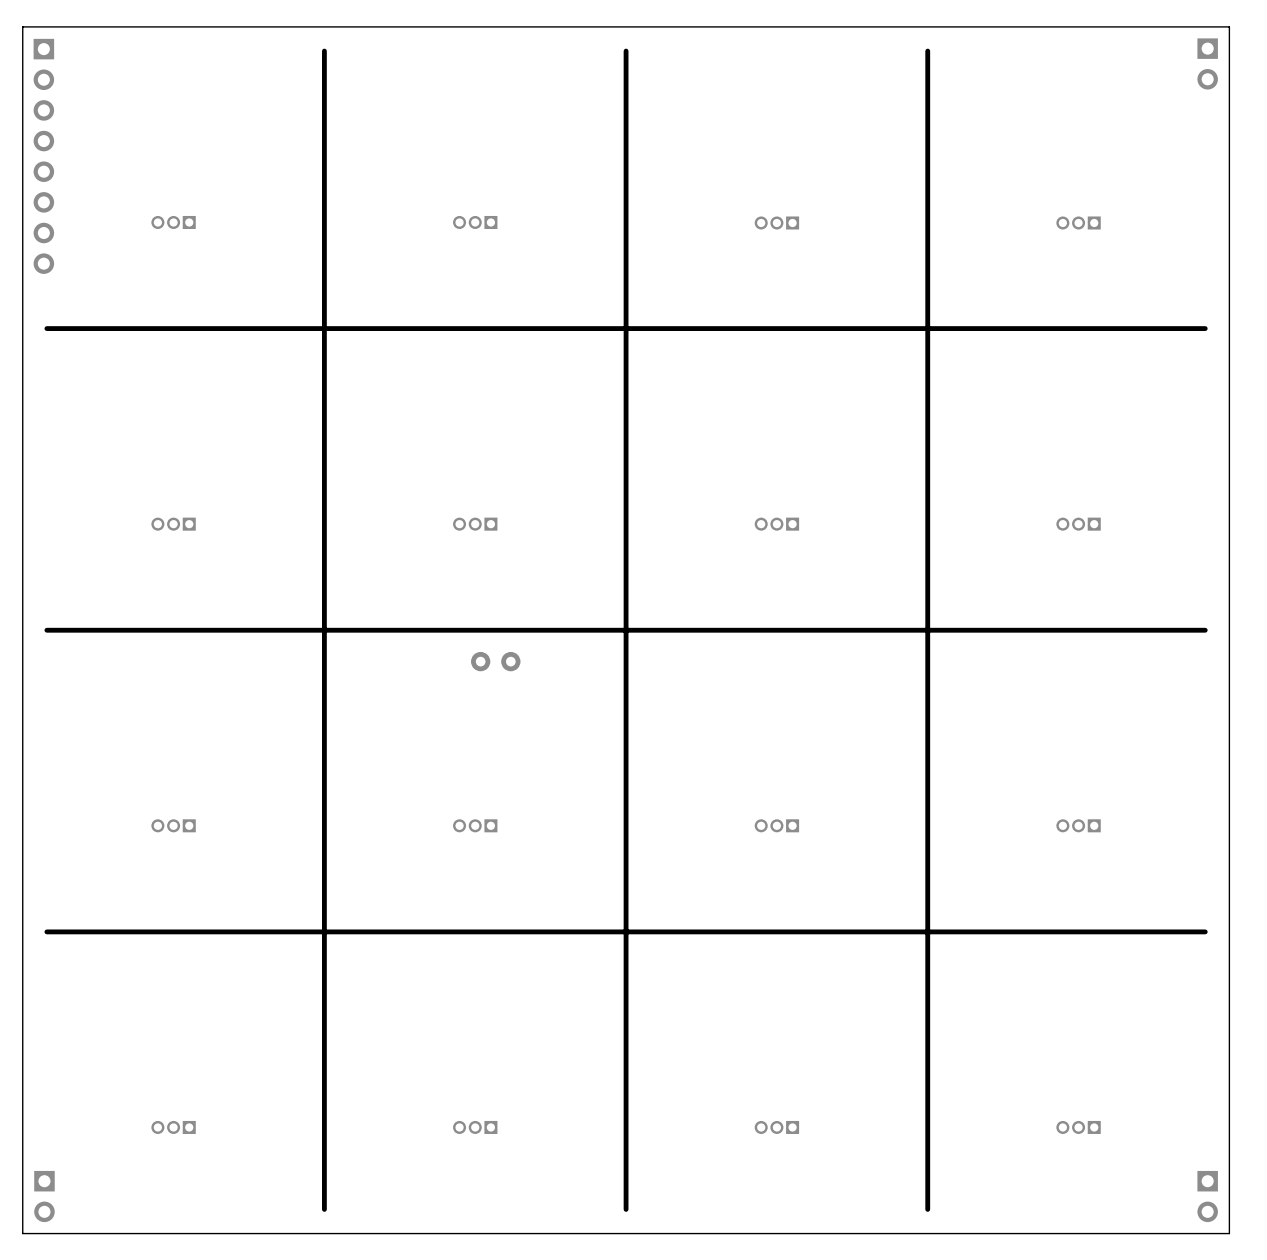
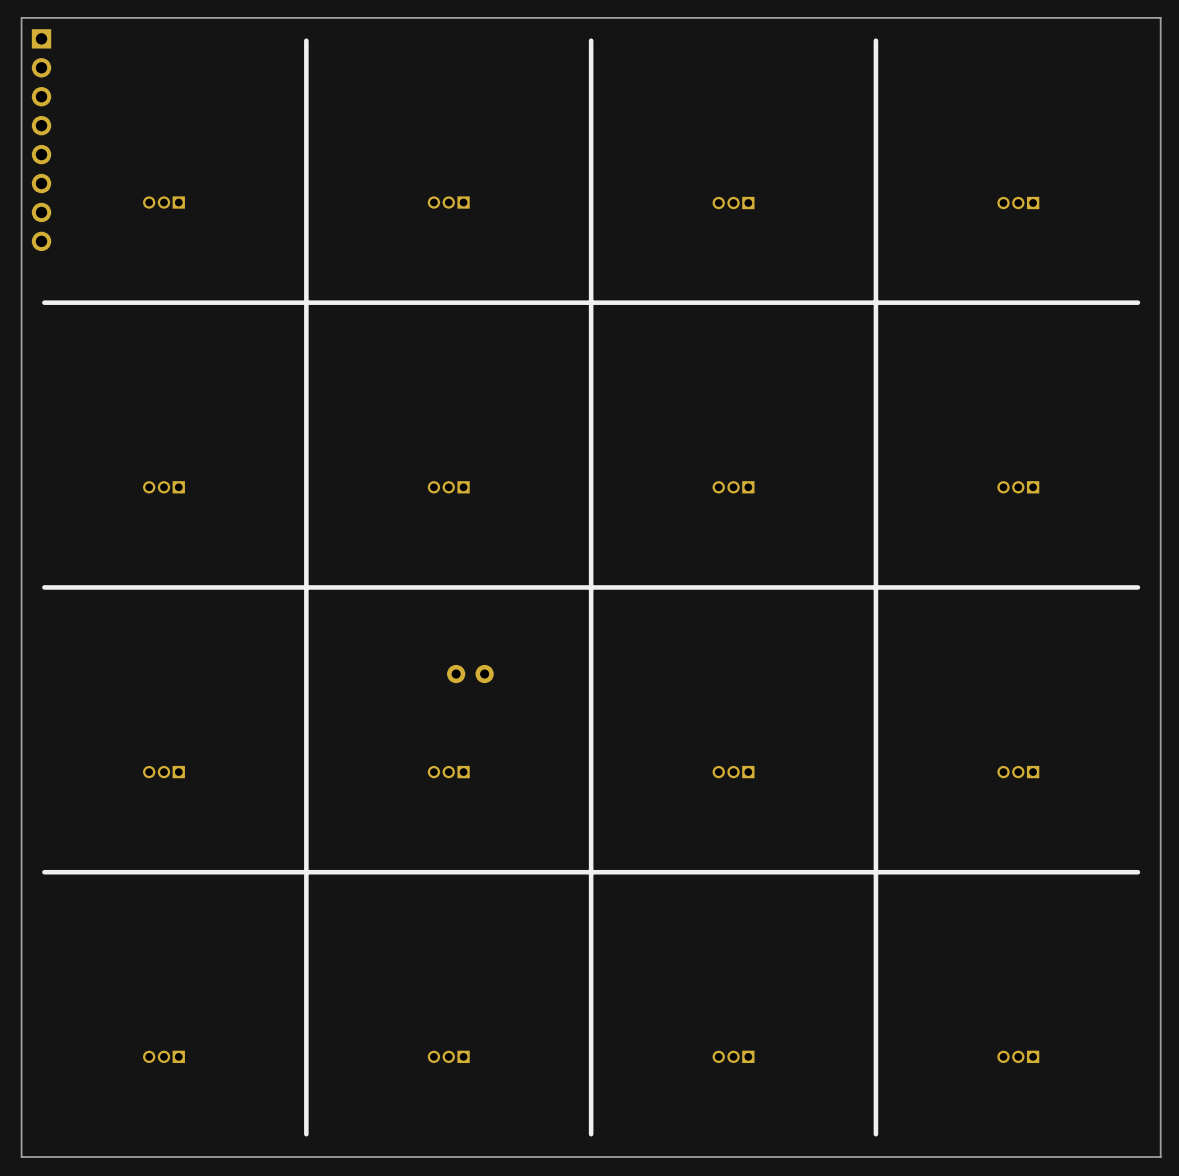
part: (1207, 63) -> none
part position: (495, 661) -> (470, 674)
part: (44, 1196) -> none
part: (1207, 1196) -> none

